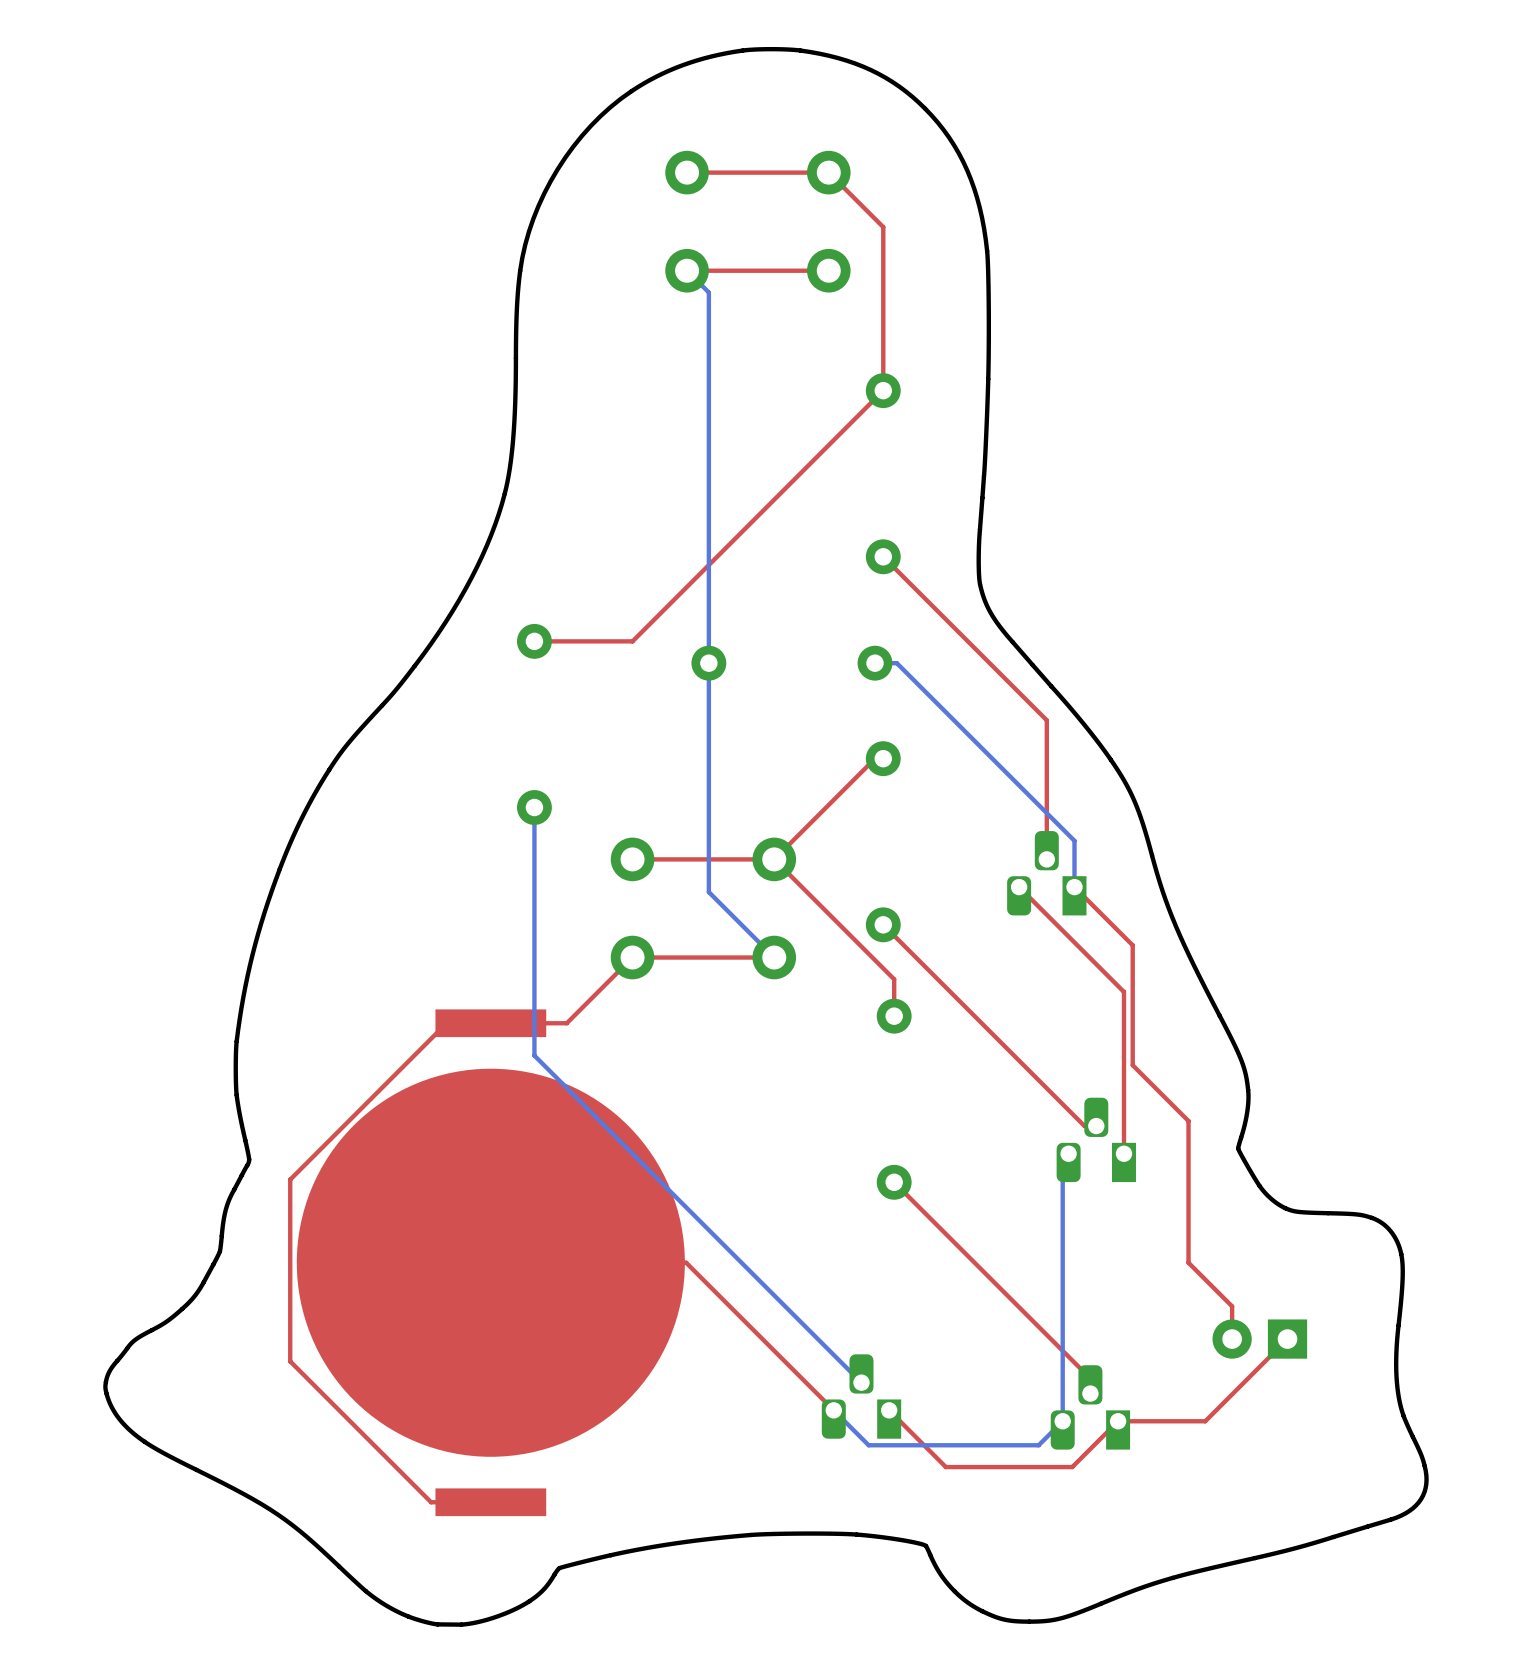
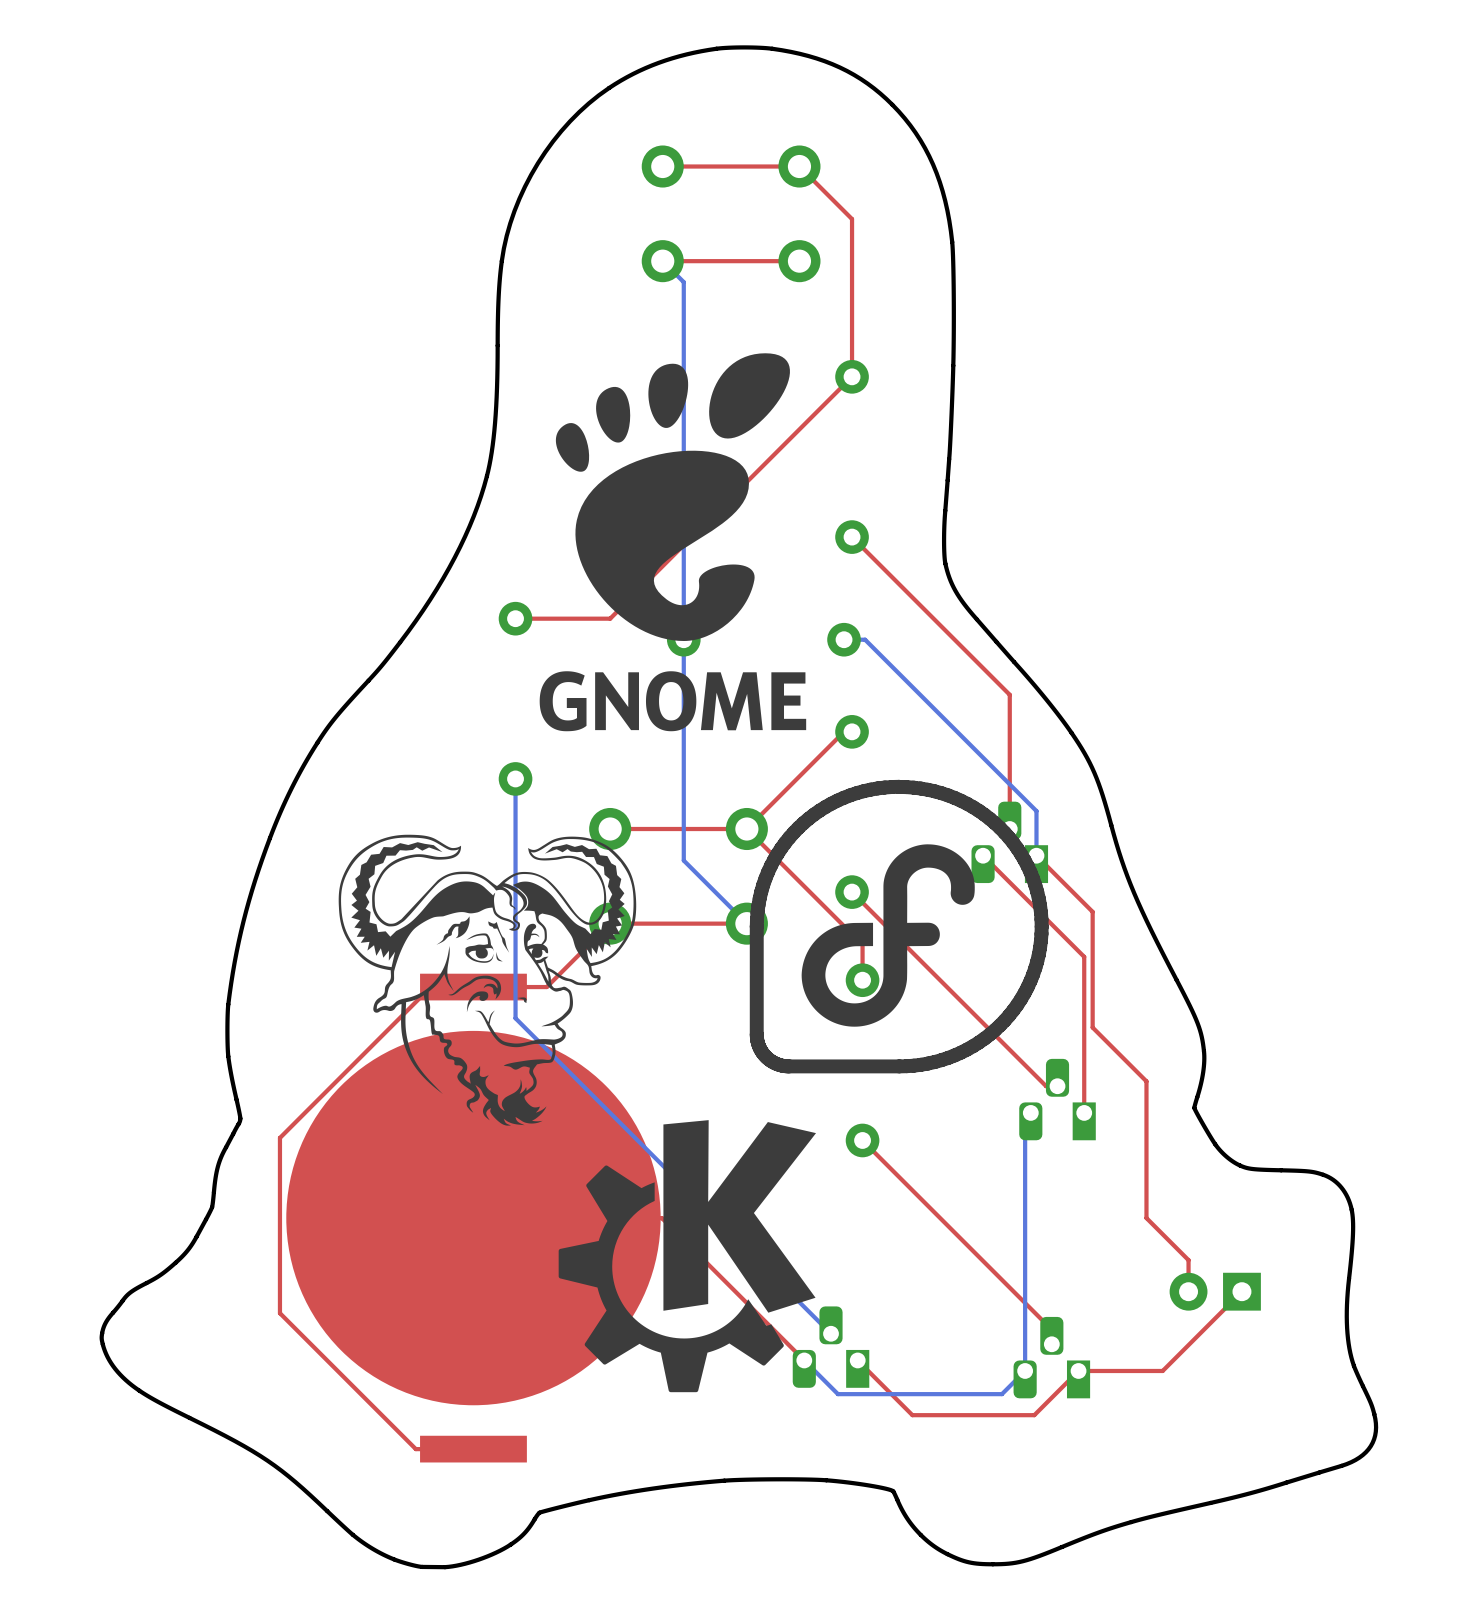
drawing: none -> [555, 353, 790, 642]
drawing: none -> [539, 671, 807, 732]
line: none -> (899, 786) (877, 788) (856, 793) (819, 810) (789, 837) (768, 872) (759, 898) (756, 919) (756, 1034) (761, 1051) (775, 1063) (787, 1066) (899, 1066) (921, 1064) (941, 1060) (967, 1049) (995, 1030) (1017, 1004) (1030, 981) (1040, 947) (1040, 912) (1033, 878) (1017, 848) (995, 823) (967, 803) (934, 791) (899, 786)
drawing: none -> [338, 834, 637, 1126]
drawing: none -> [801, 844, 975, 1027]
drawing: none -> [558, 1120, 817, 1393]

